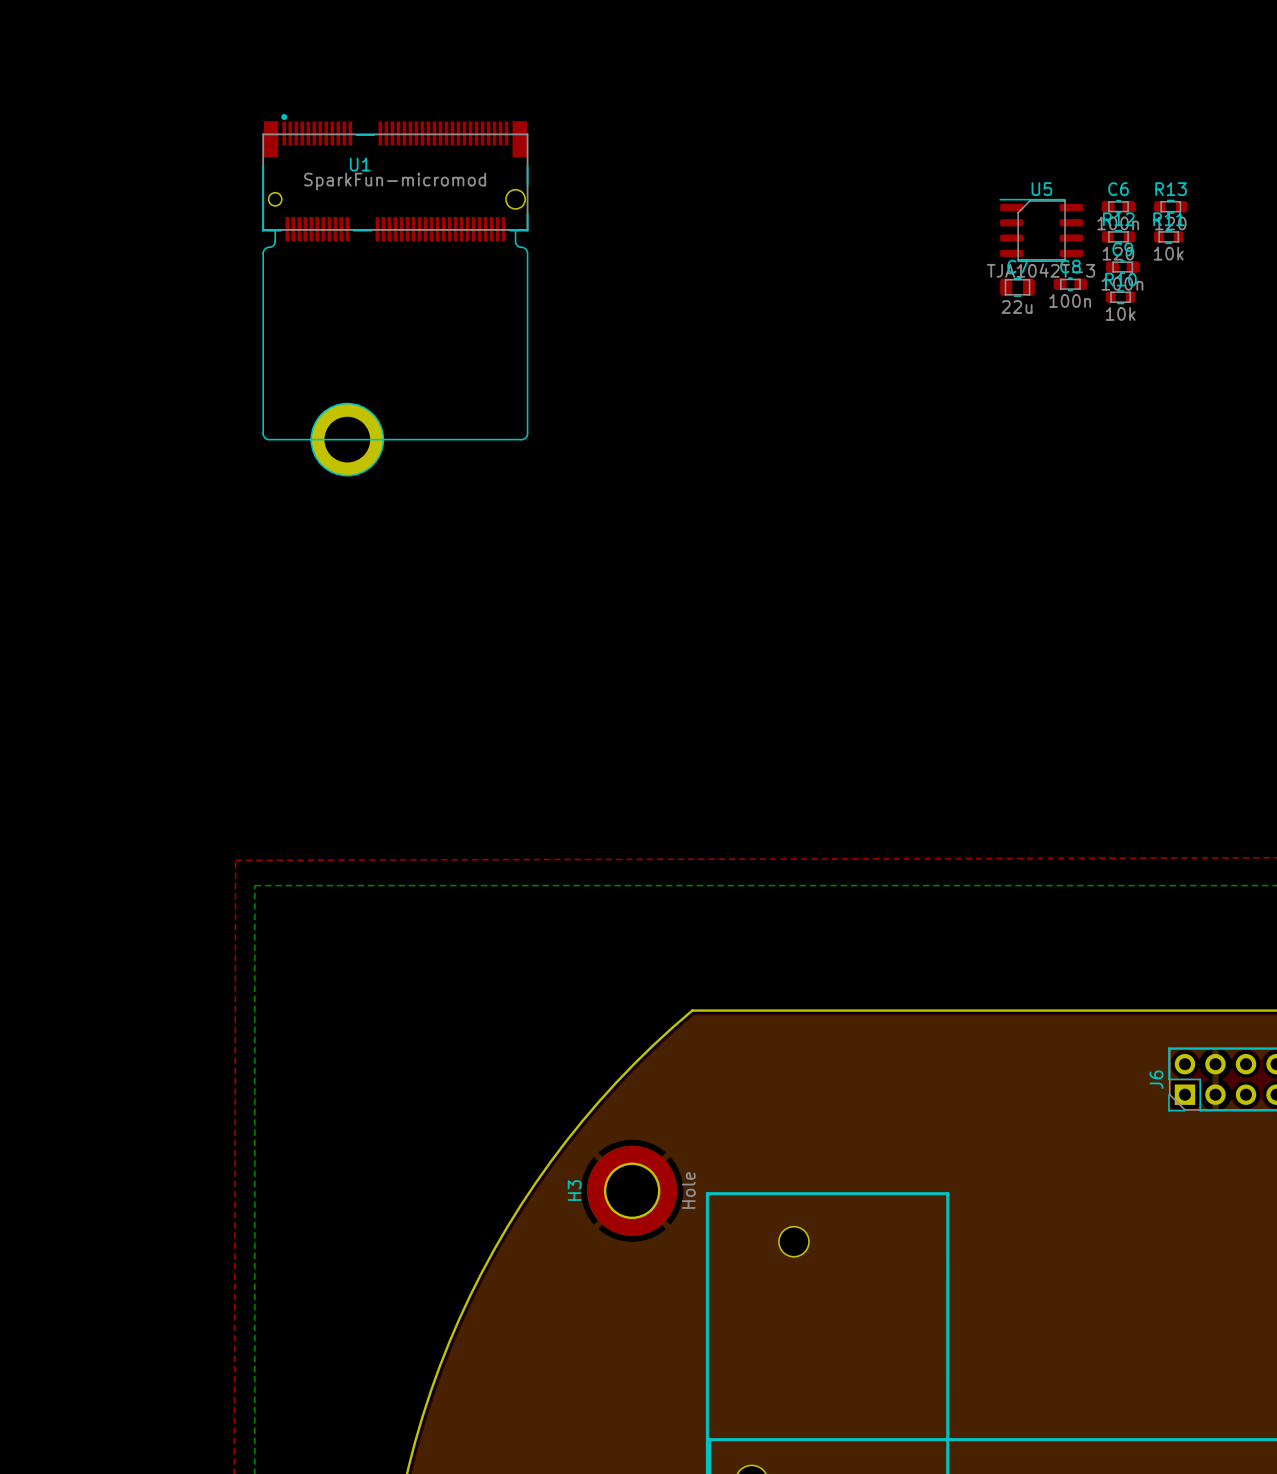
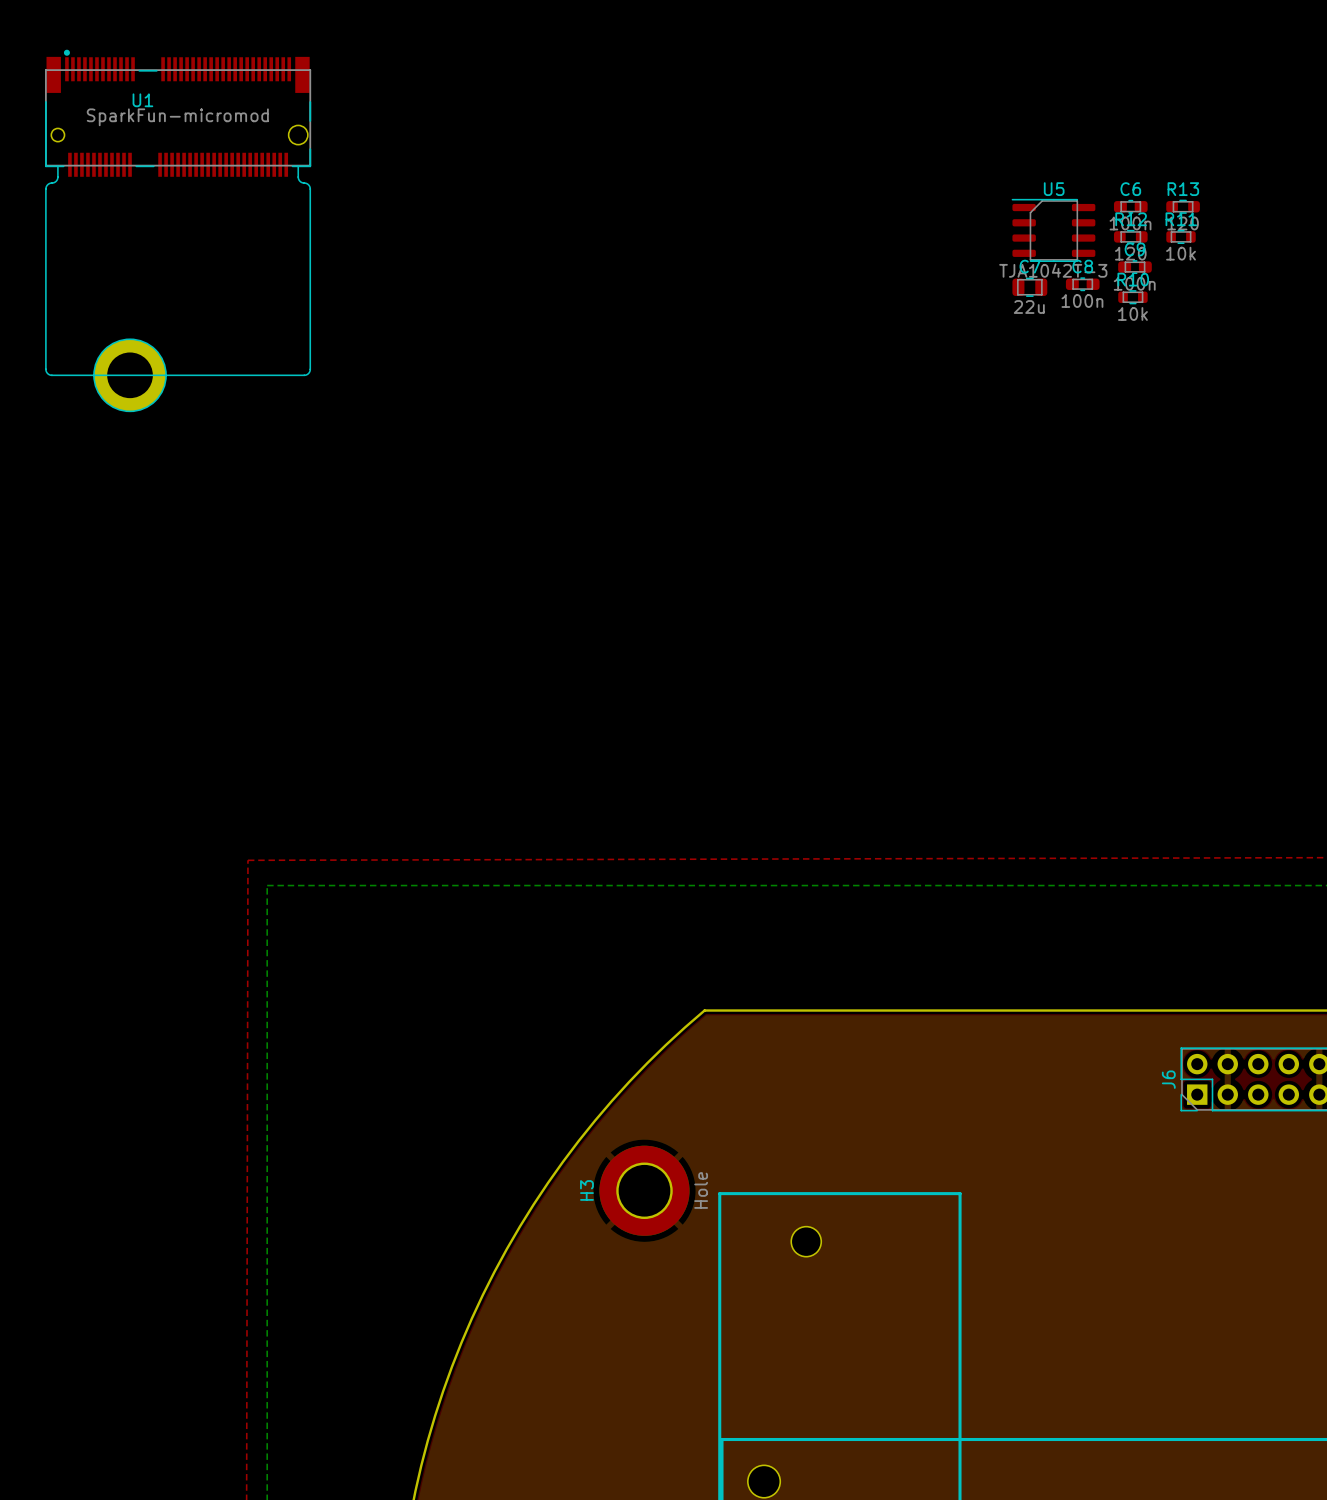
U1 position: (395, 295) -> (178, 230)

